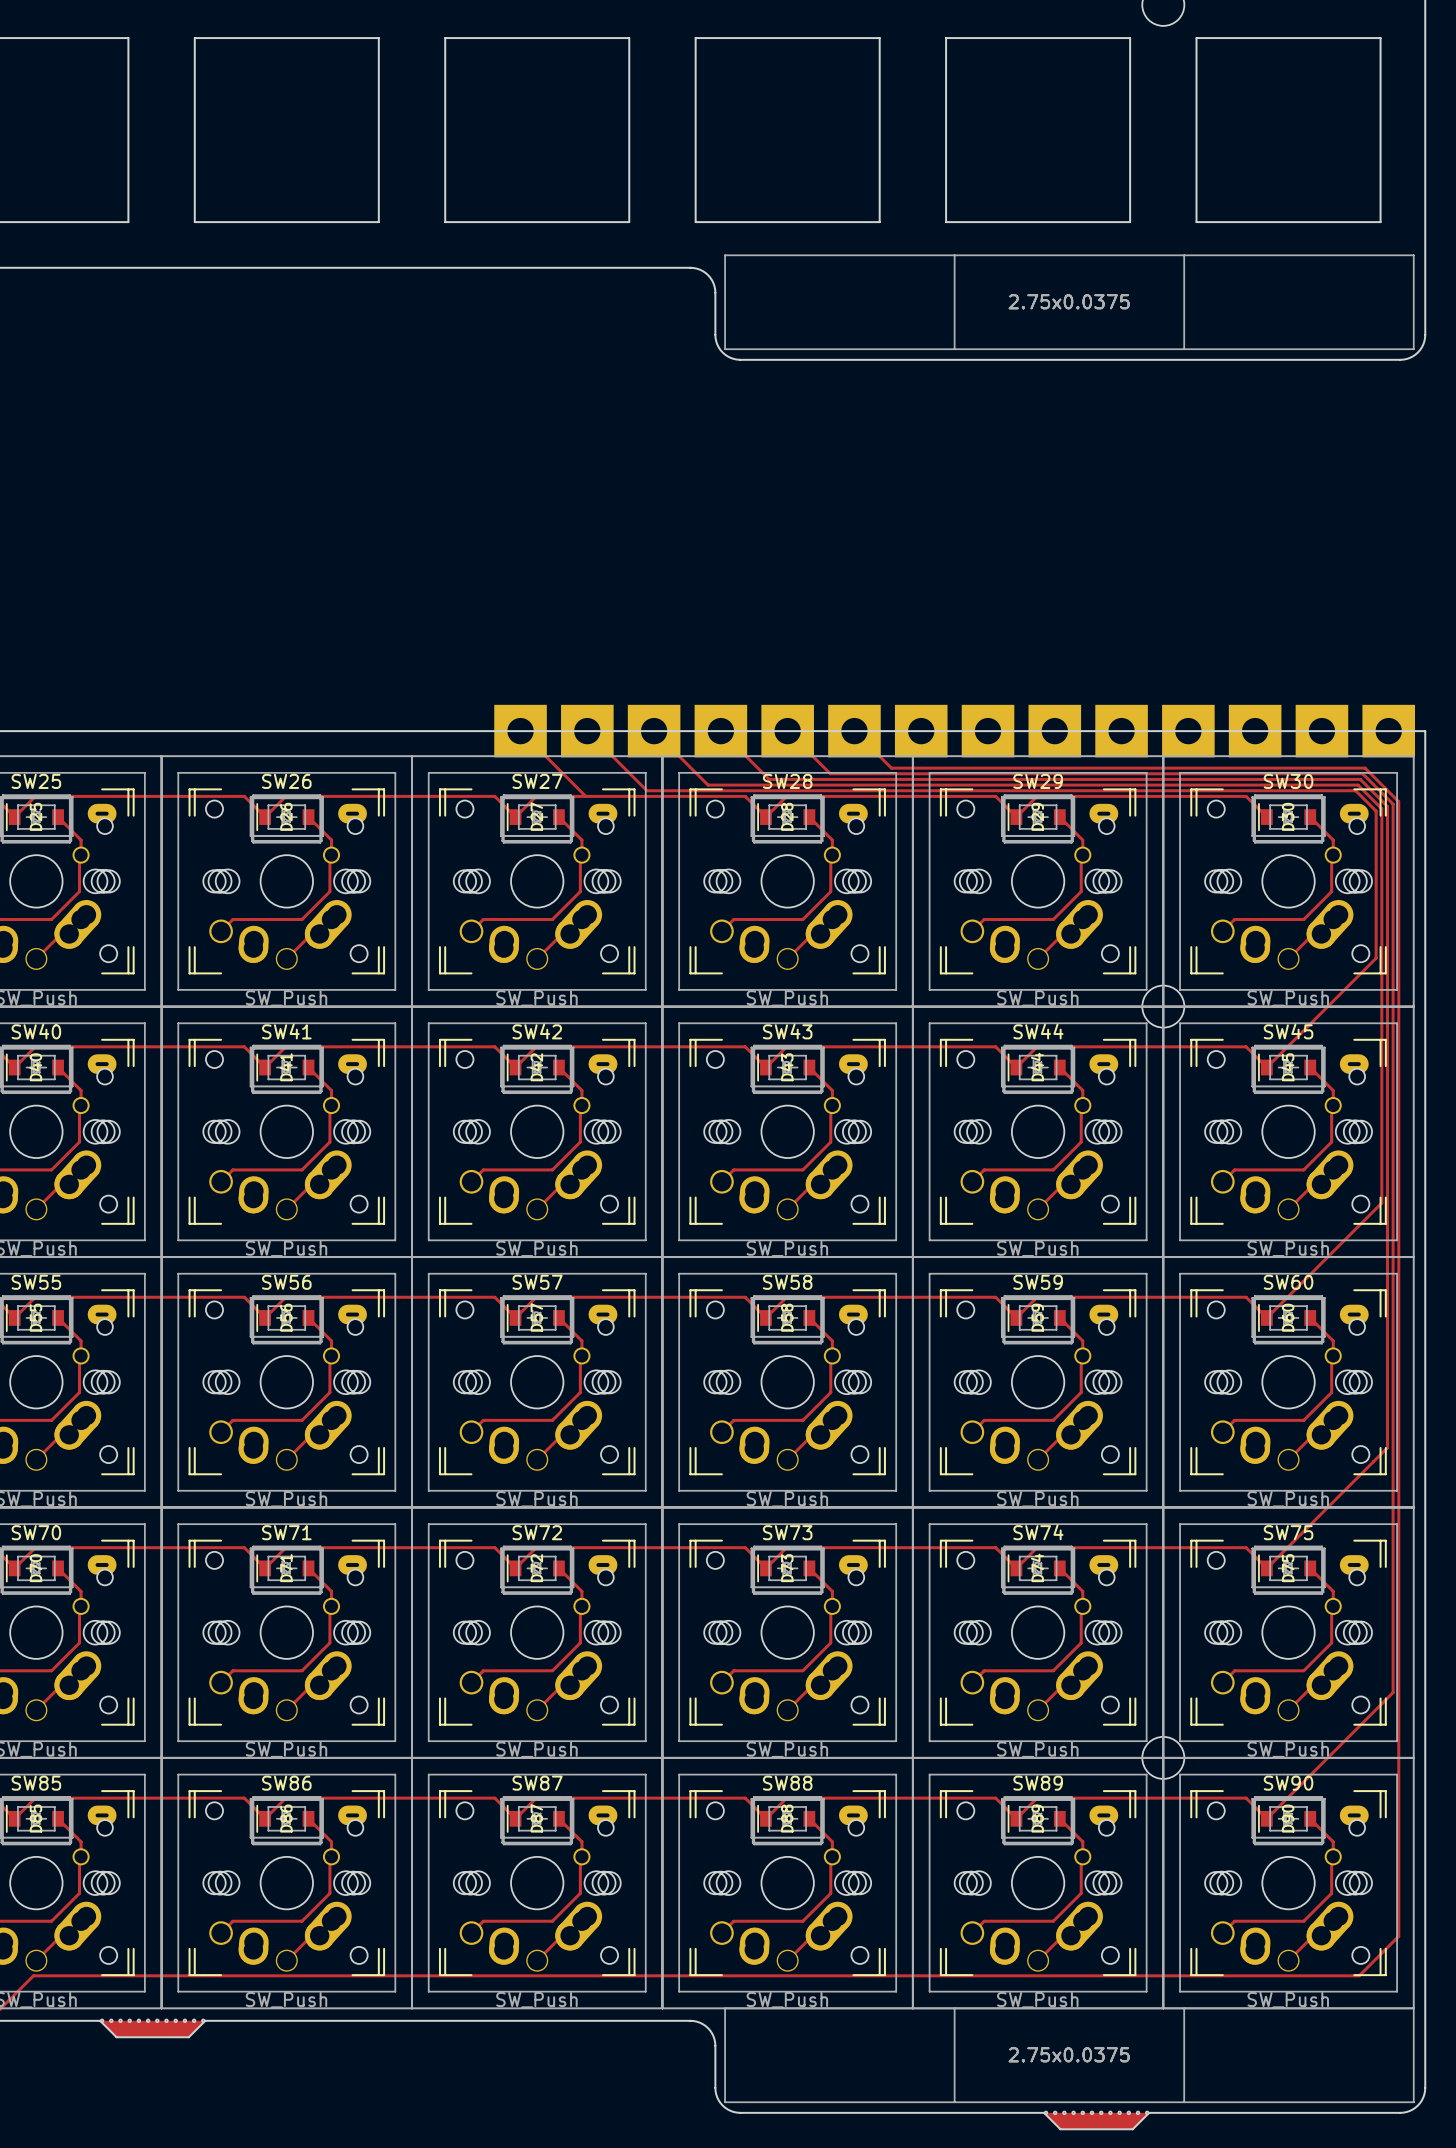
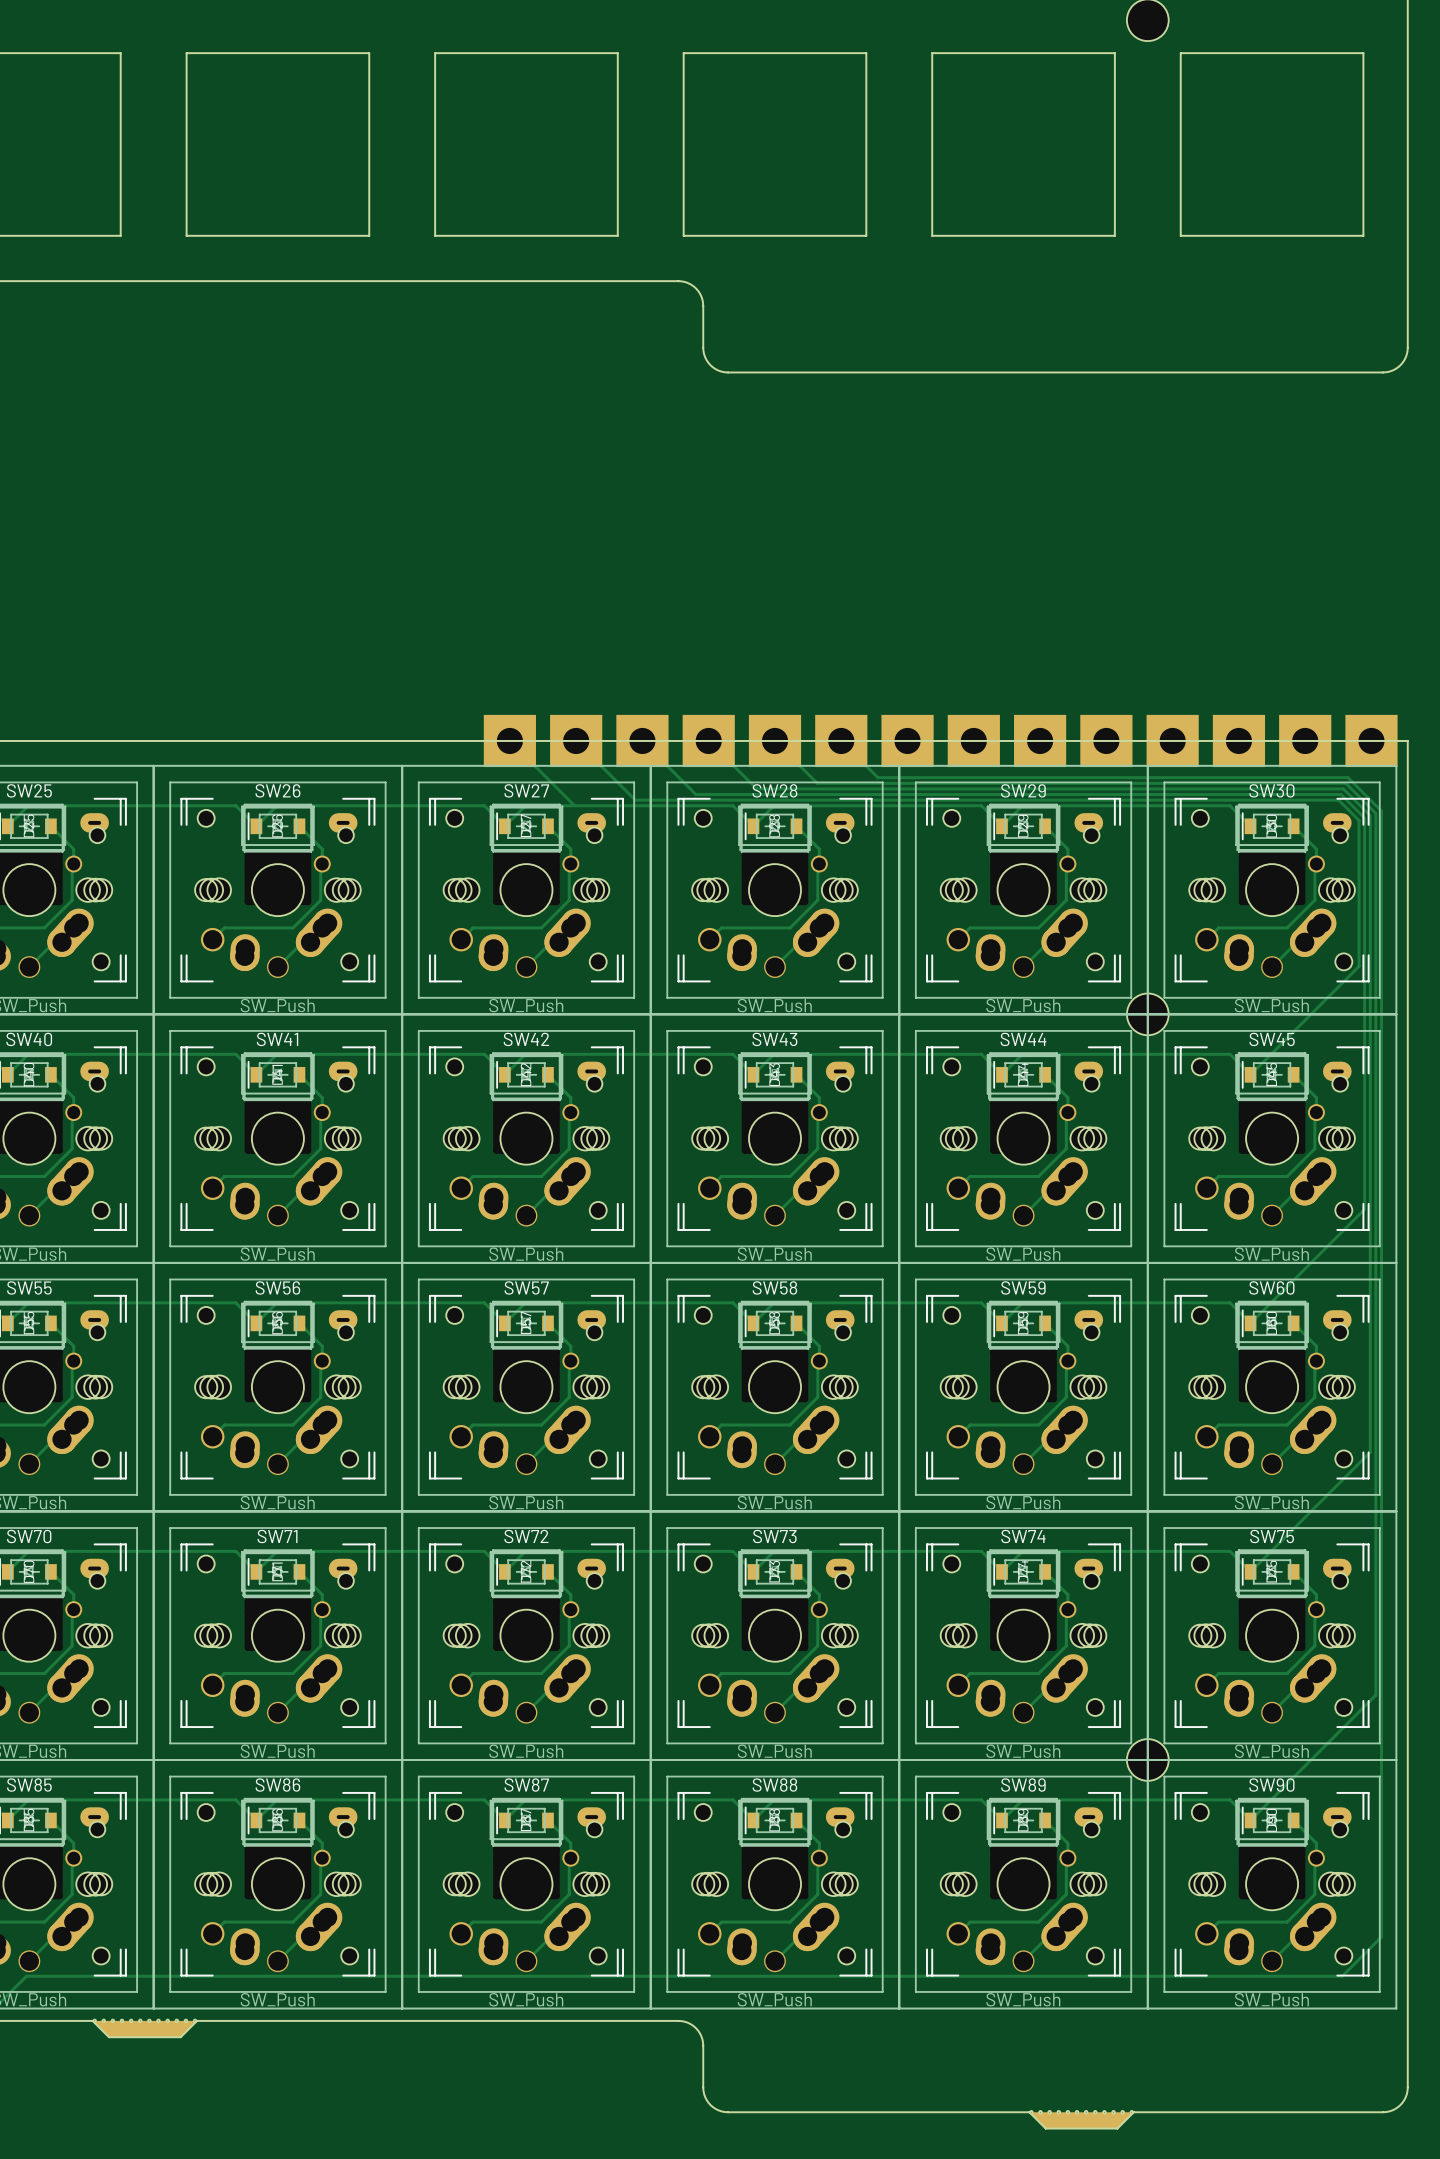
2.75x0.0375: 2.75x0.0375 (1069, 302) -> none
2.75x0.0375: 2.75x0.0375 (1069, 2055) -> none

